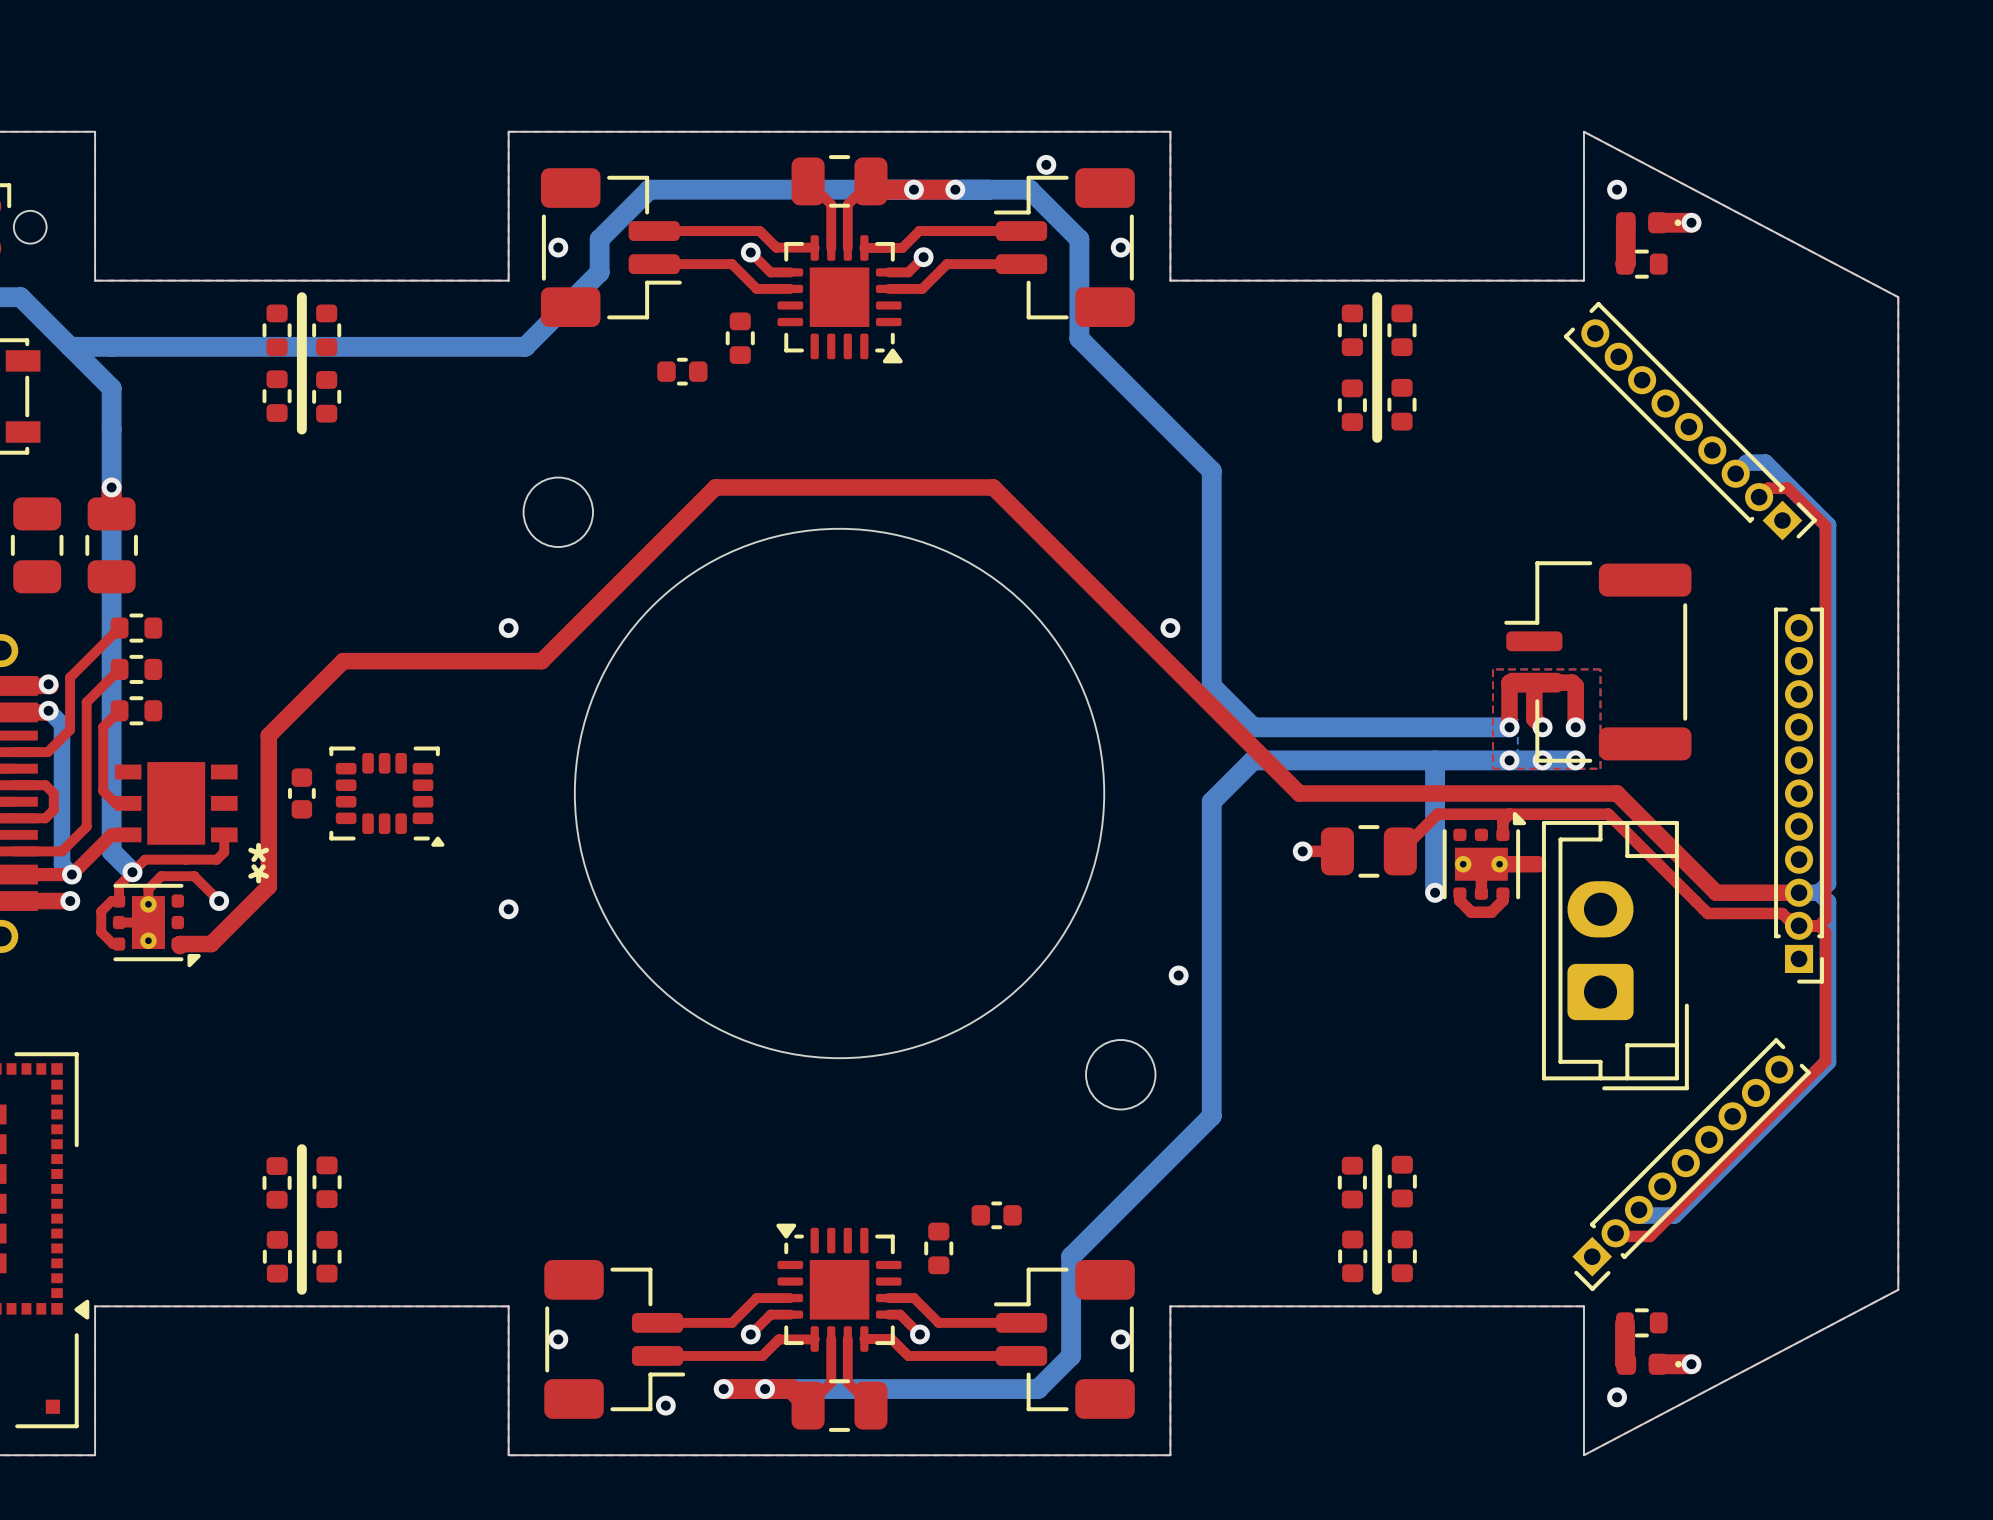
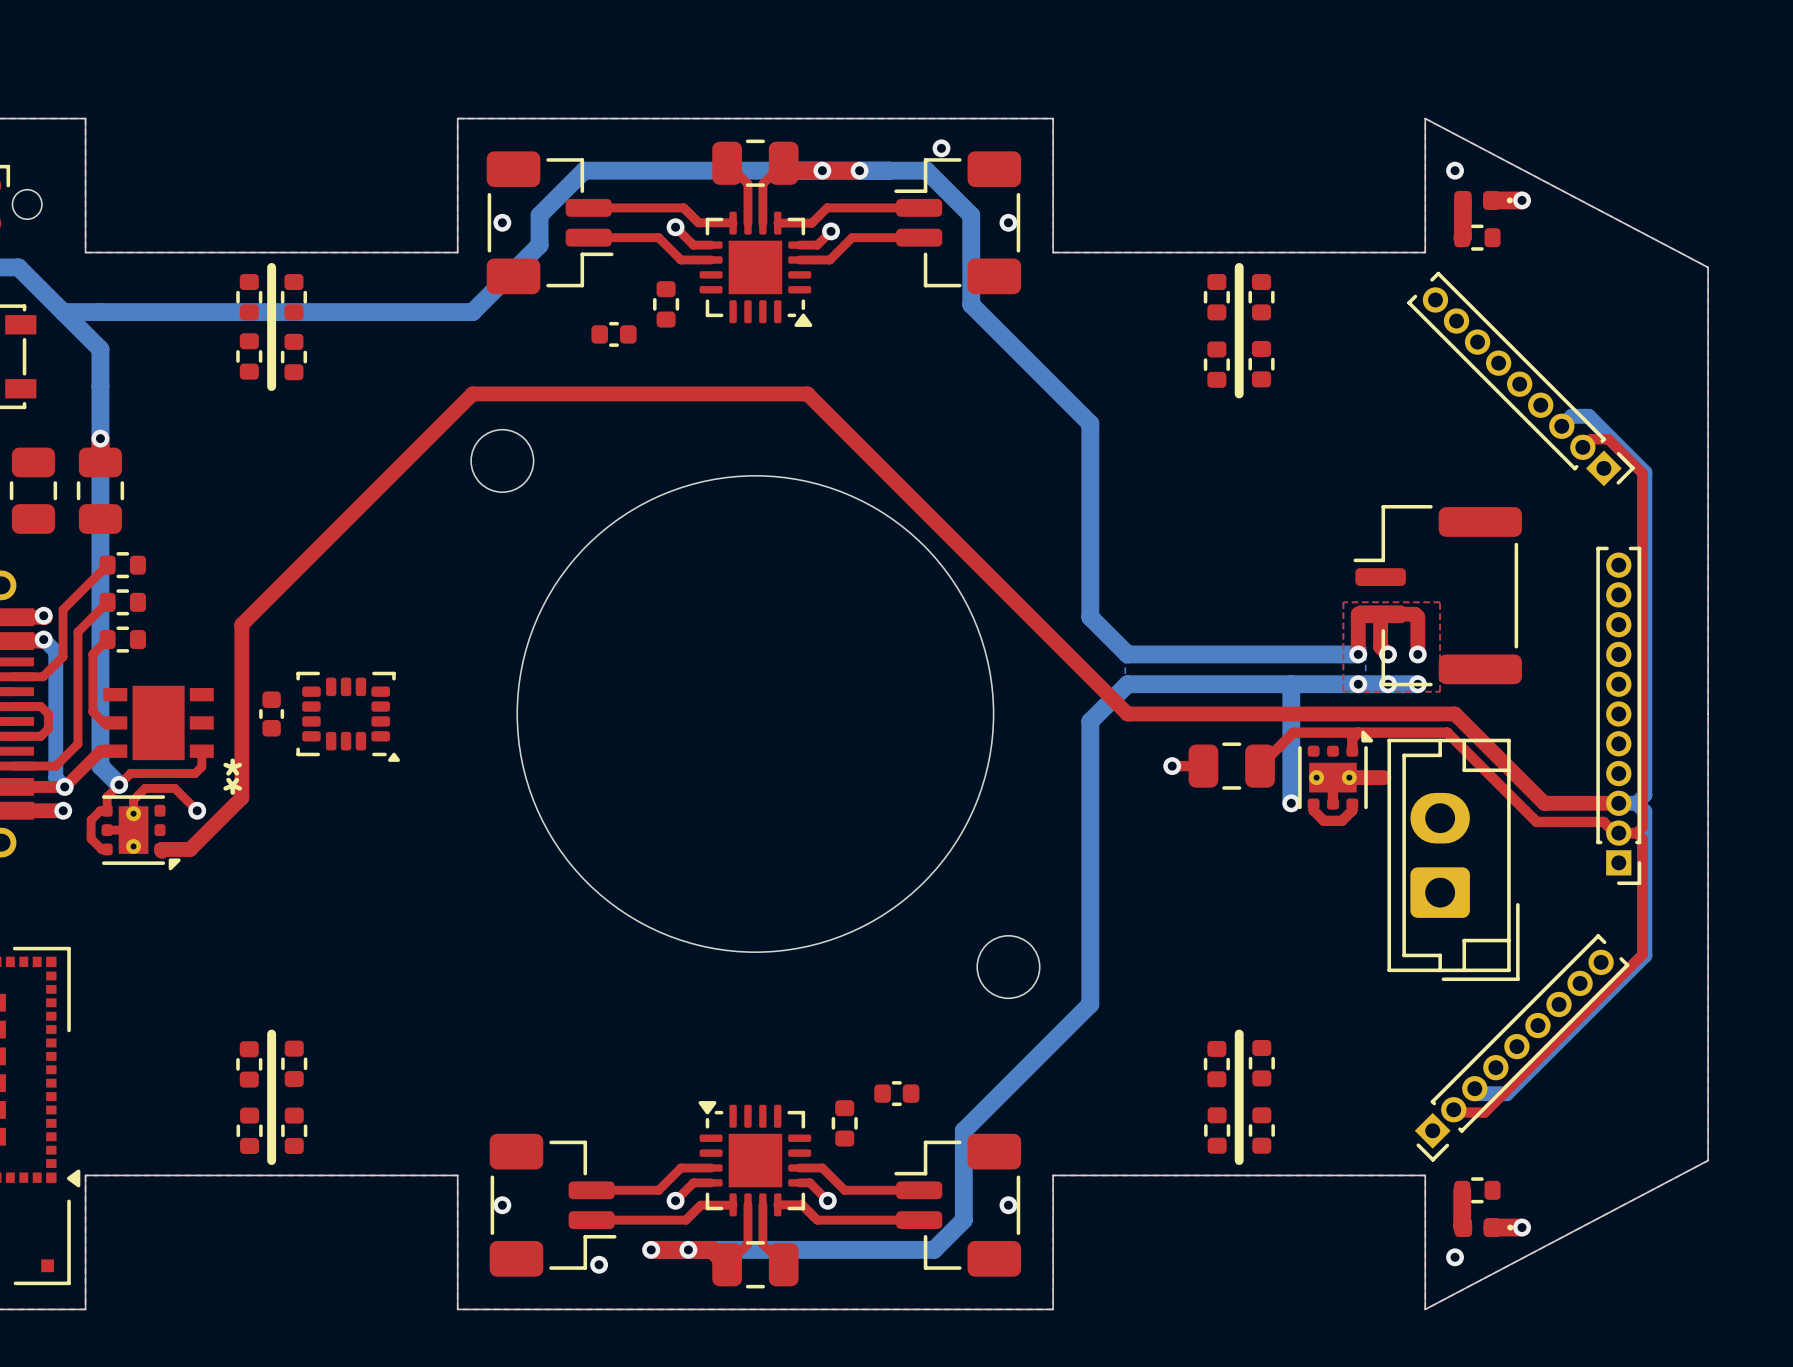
via: (508, 628) -> none
via: (1170, 628) -> none
top track: (268, 735) (343, 661) (541, 661) (715, 487) (993, 487) (1299, 793) -> (241, 661) (241, 624) (472, 393) (807, 393) (1127, 713) (1169, 713)
via: (508, 909) -> none
via: (1178, 975) -> none

